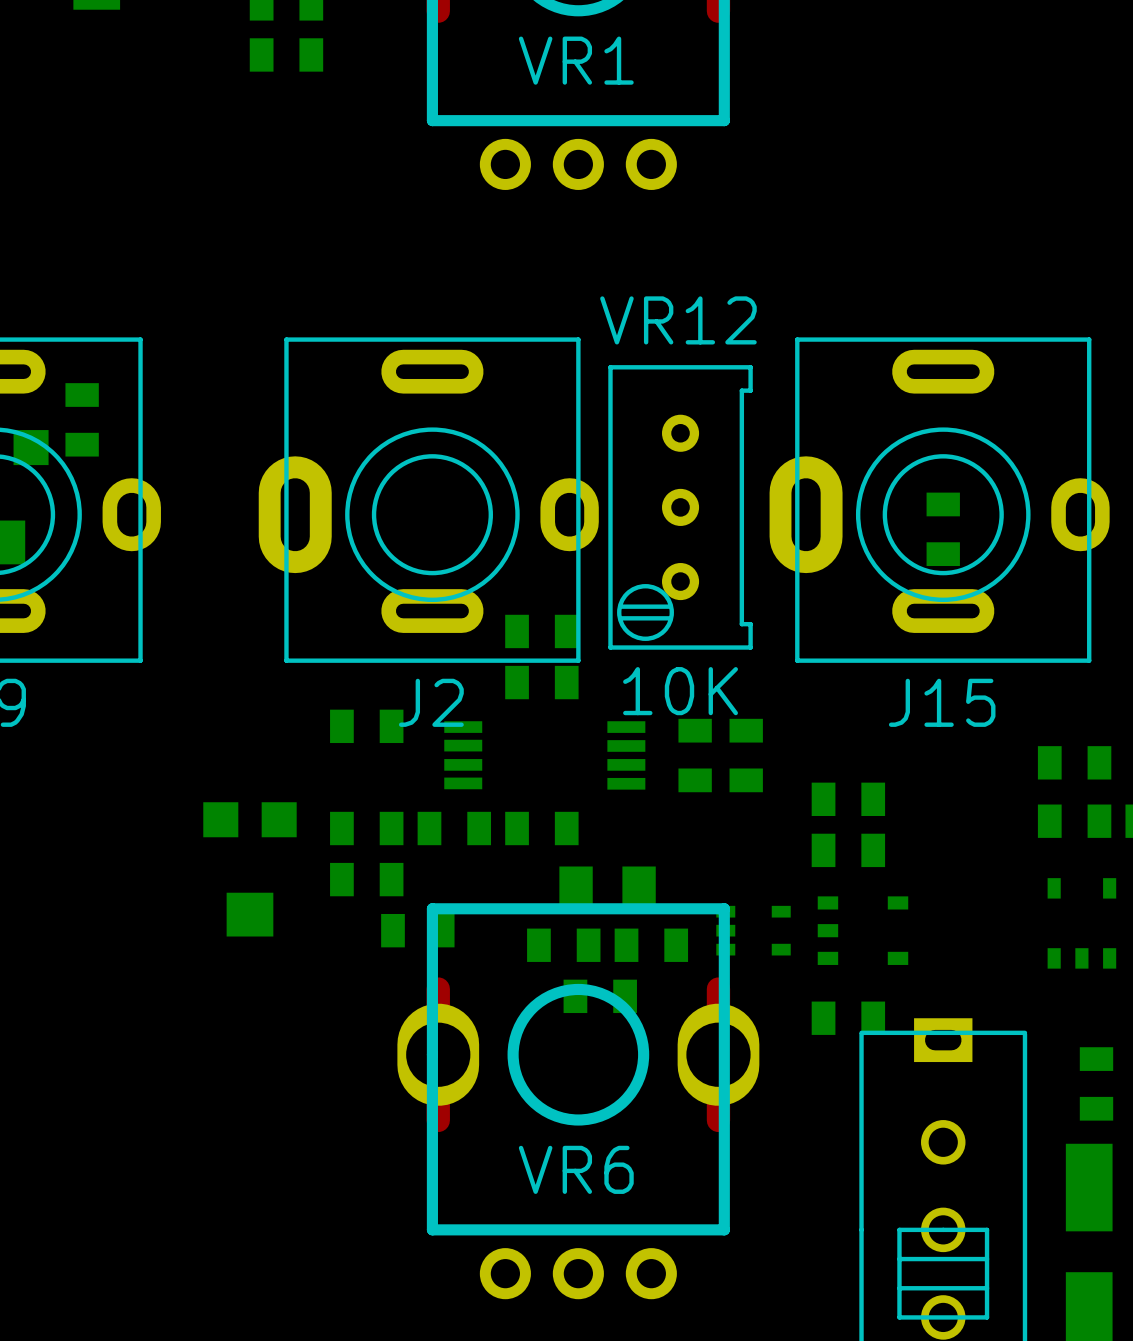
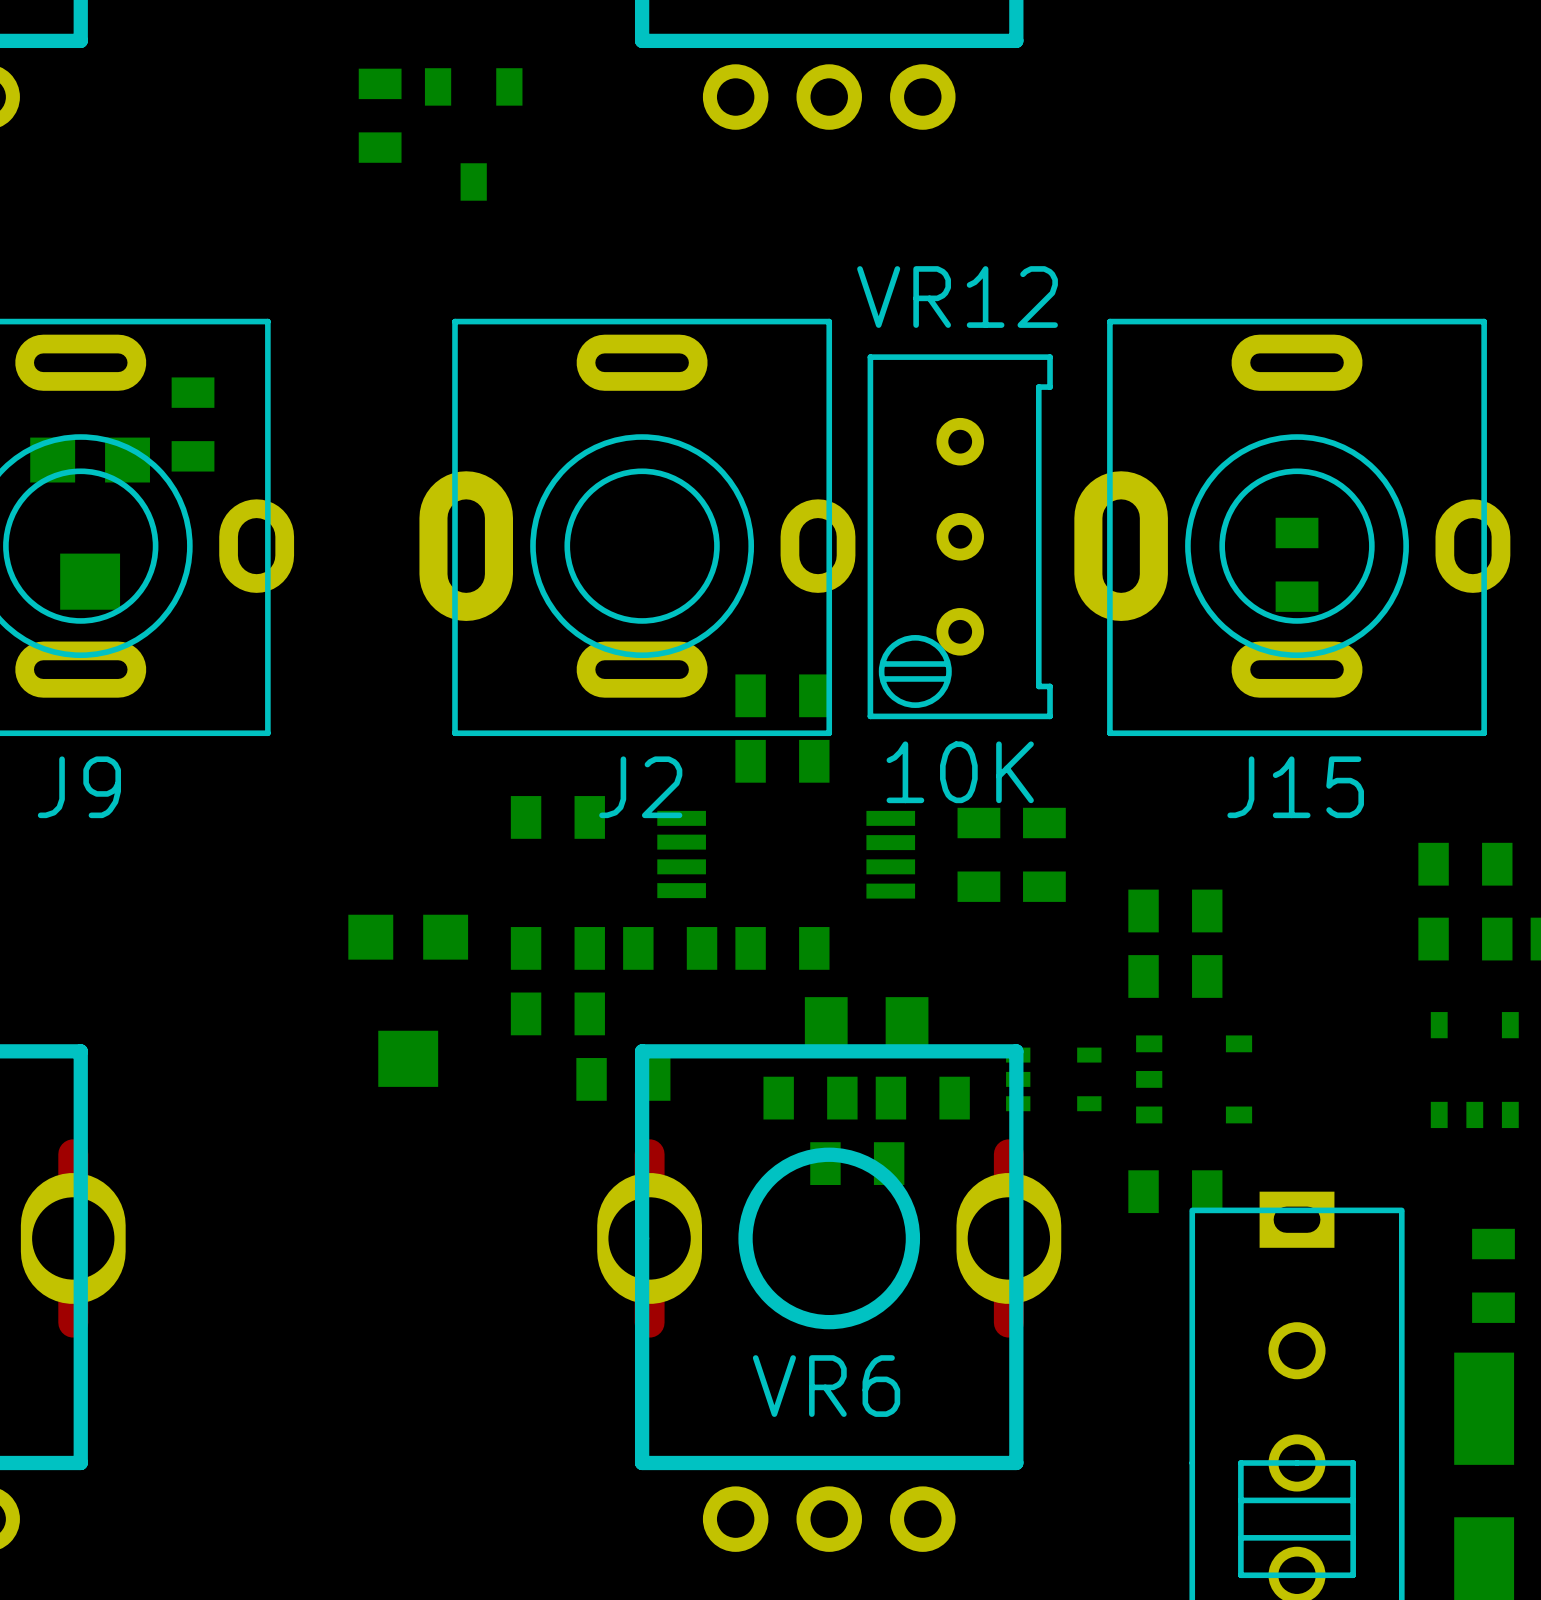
part: none -> (380, 115)
part: none -> (473, 134)

